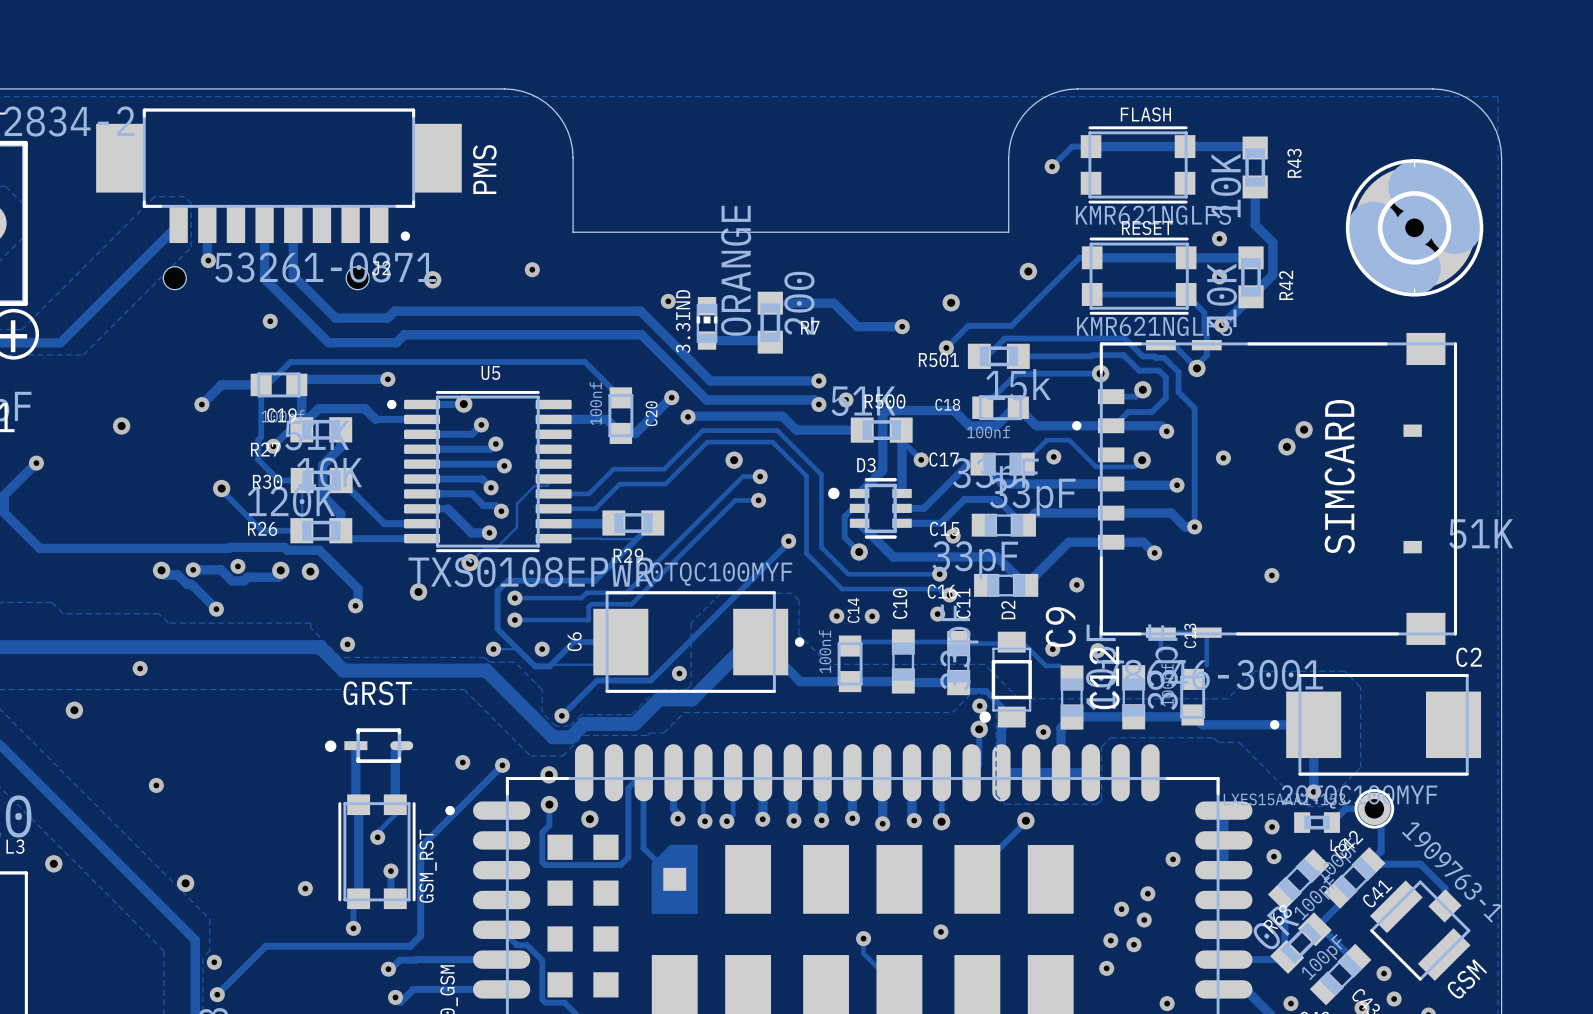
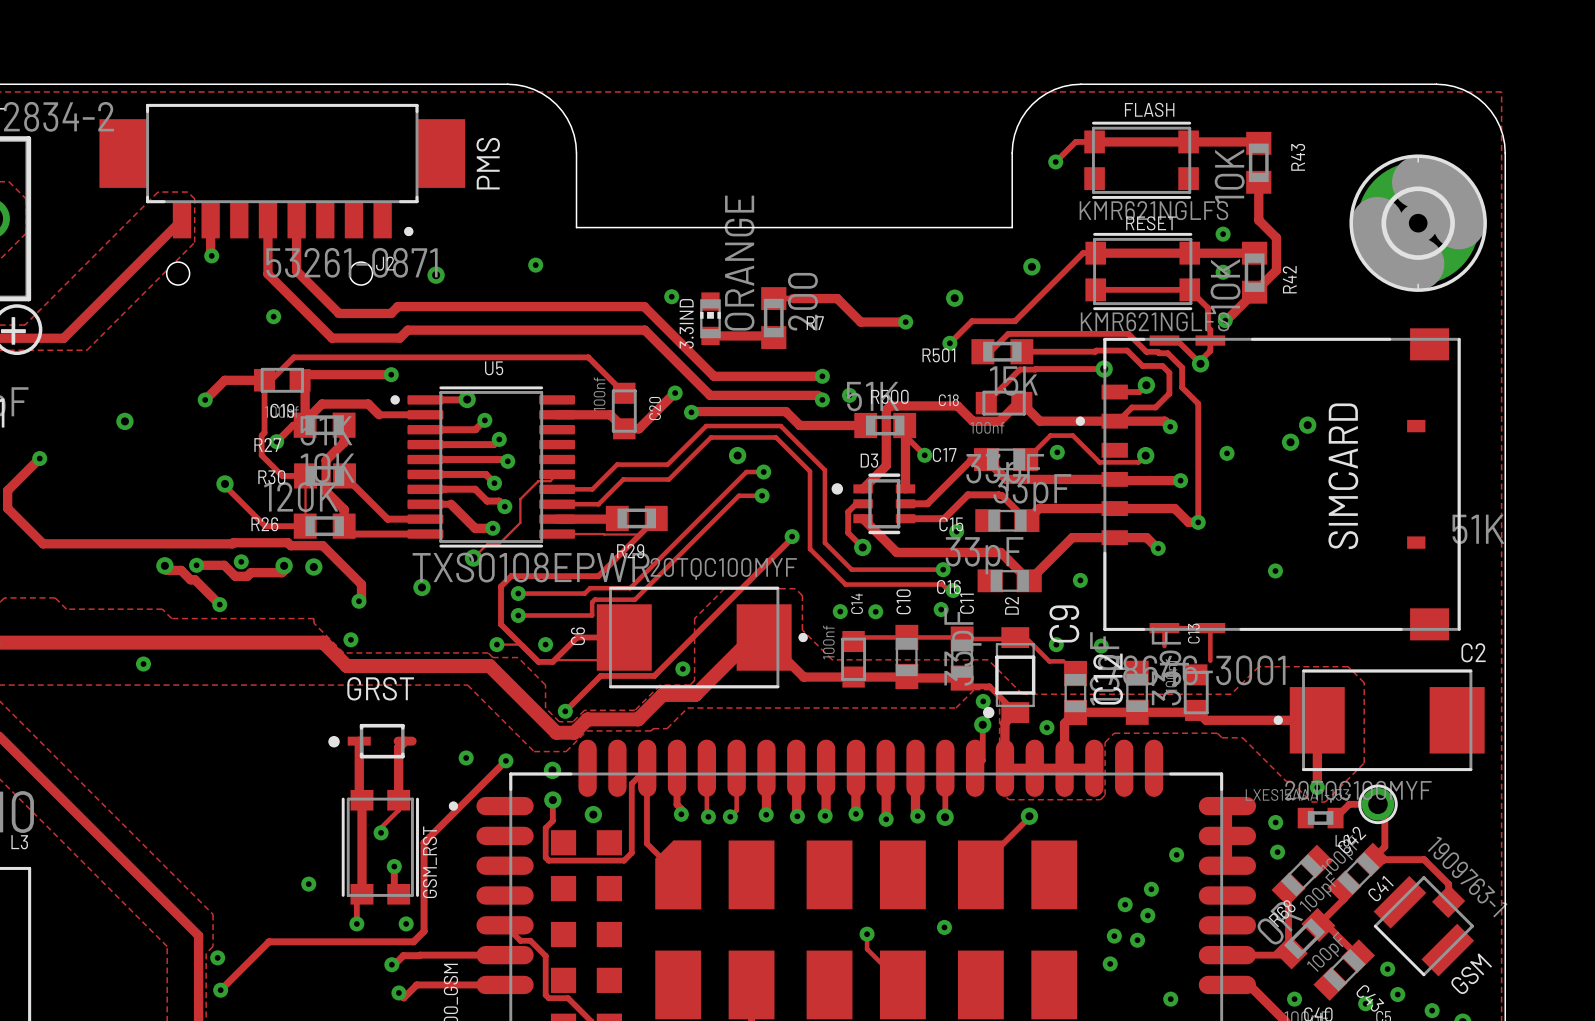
via: (74, 710) -> none
via: (156, 785) -> none
via: (53, 863) -> none
via: (185, 883) -> none
via: none -> (406, 923)

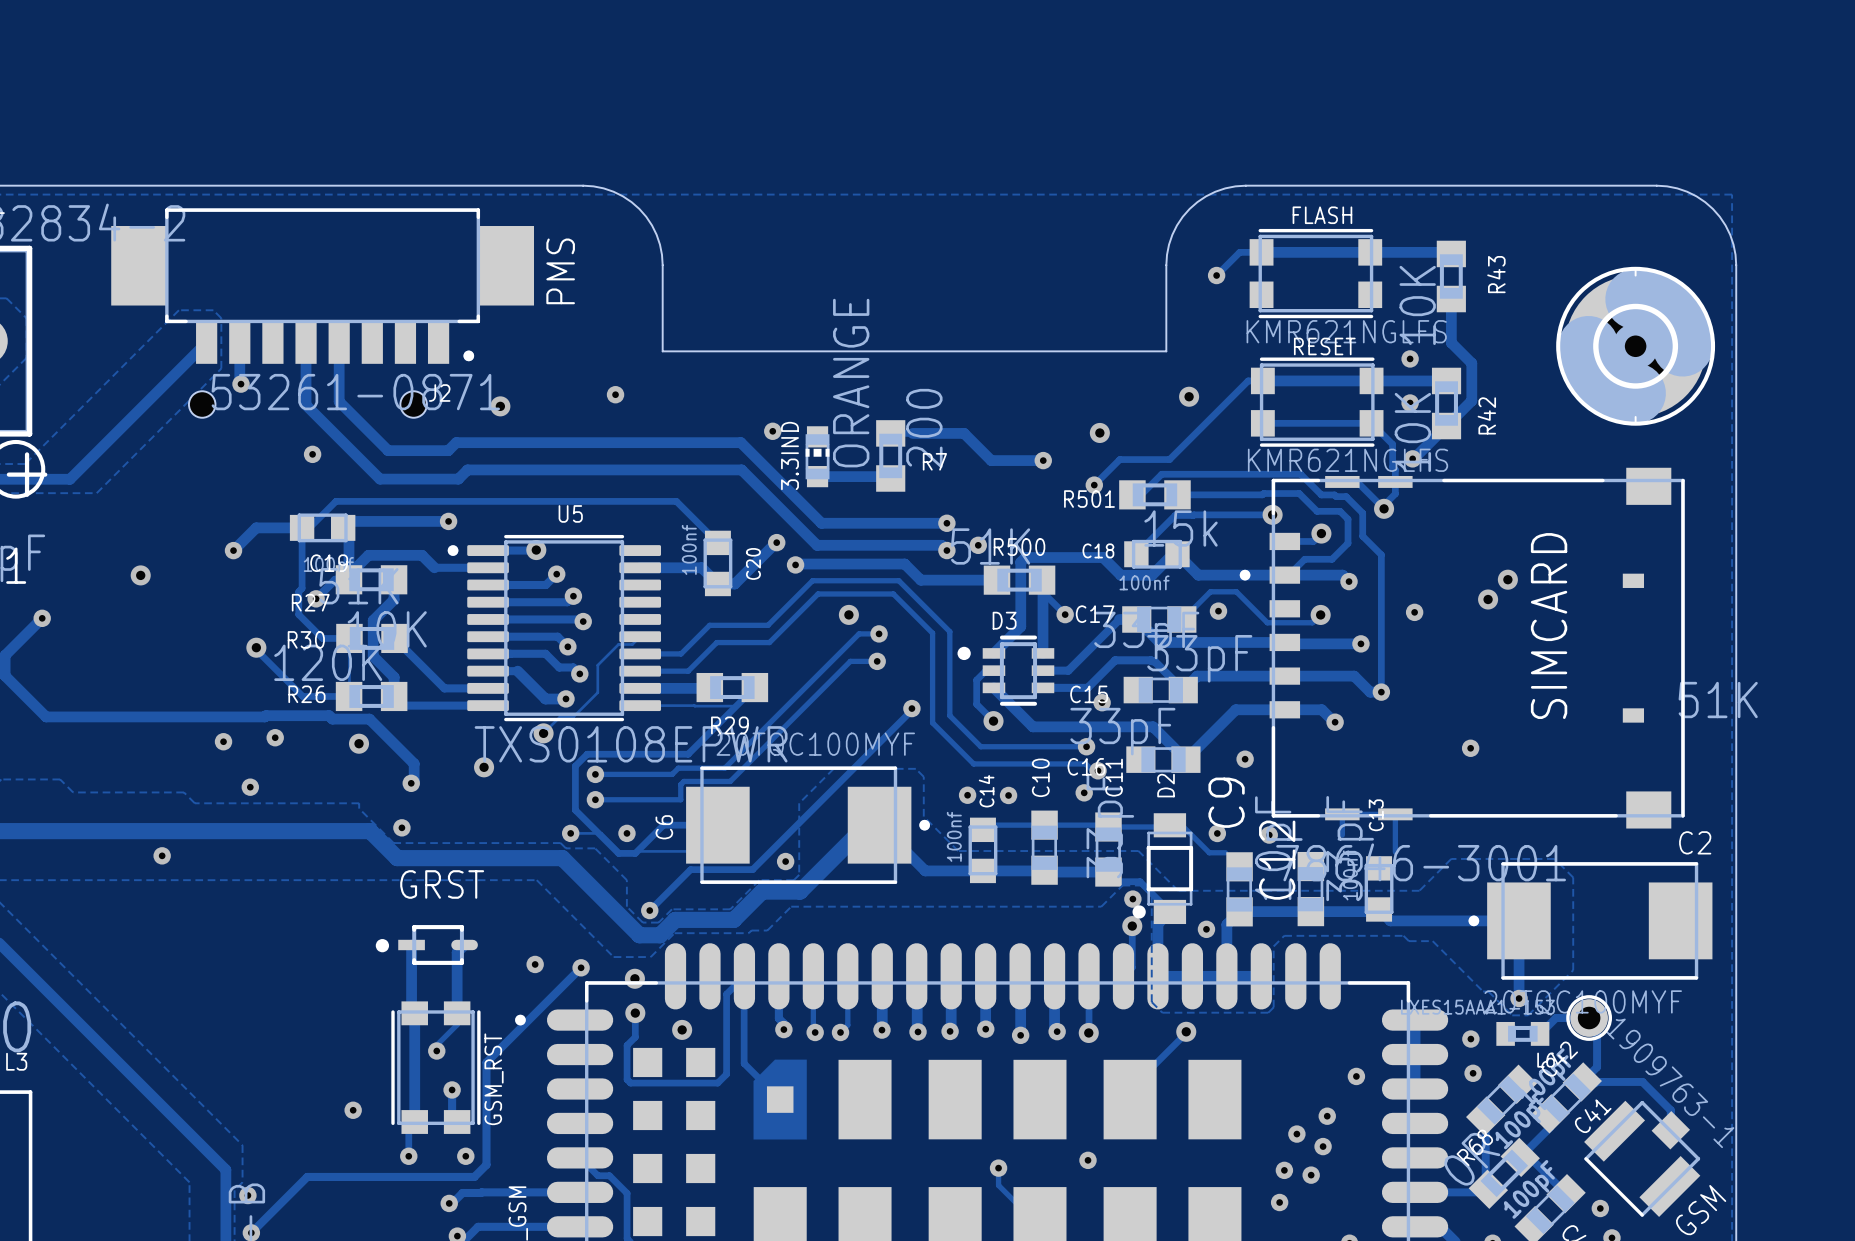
track: (164, 565) (167, 570) (181, 570) (190, 579) (194, 579) (219, 604) -> none
via: (164, 565) -> none
track: (196, 565) (224, 565) (235, 576) (247, 576) (250, 572) (281, 572) (284, 565) -> none
via: (284, 565) -> none

